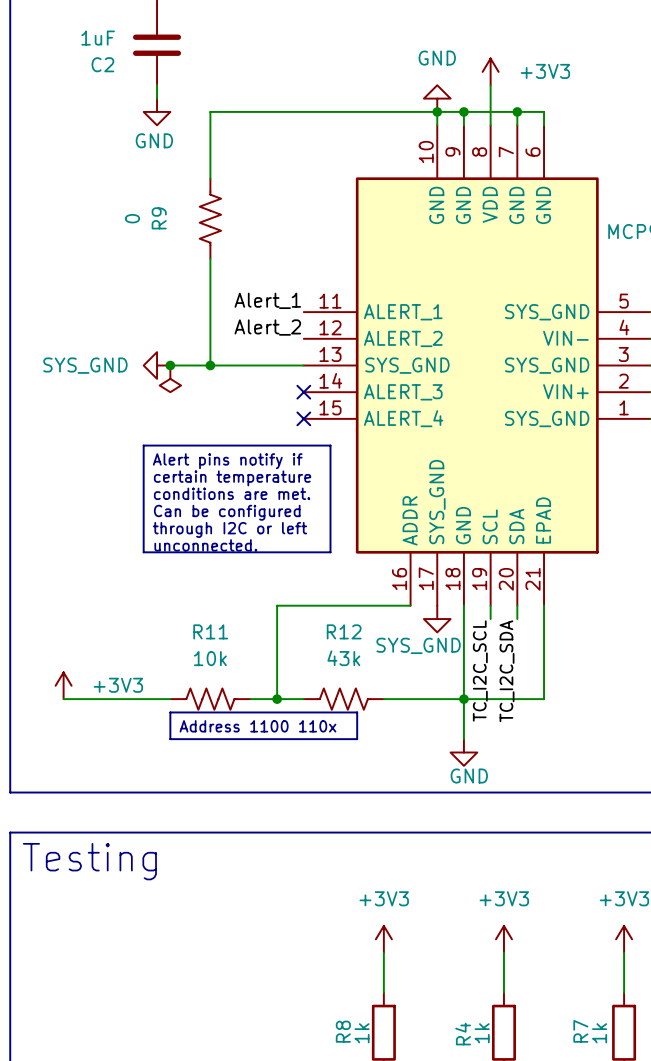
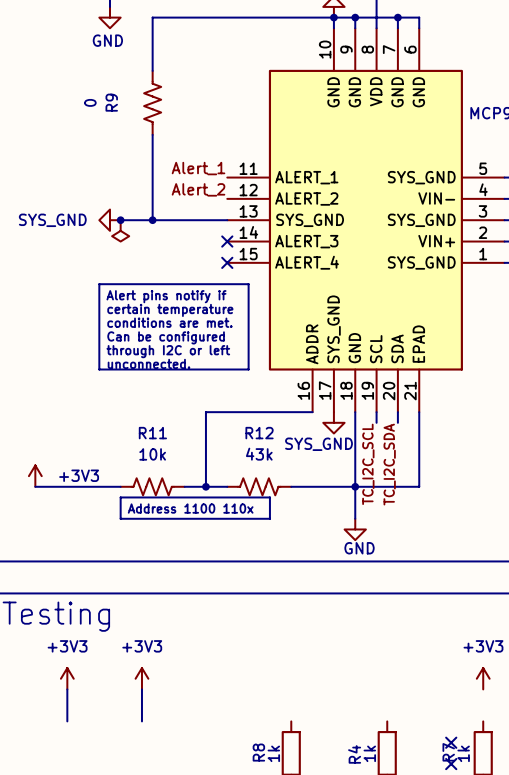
power symbol: none -> +3V3 (67, 678)
power symbol: none -> +3V3 (141, 678)
power symbol: +3V3 (383, 939) -> none
power symbol: +3V3 (503, 939) -> none
wire: none -> (67, 689) (67, 721)
wire: (383, 952) (383, 992) -> (141, 689) (141, 721)
wire: (503, 952) (503, 992) -> none
wire: (624, 952) (624, 992) -> none
no-connect mark: none -> (451, 742)
no-connect mark: none -> (451, 764)

